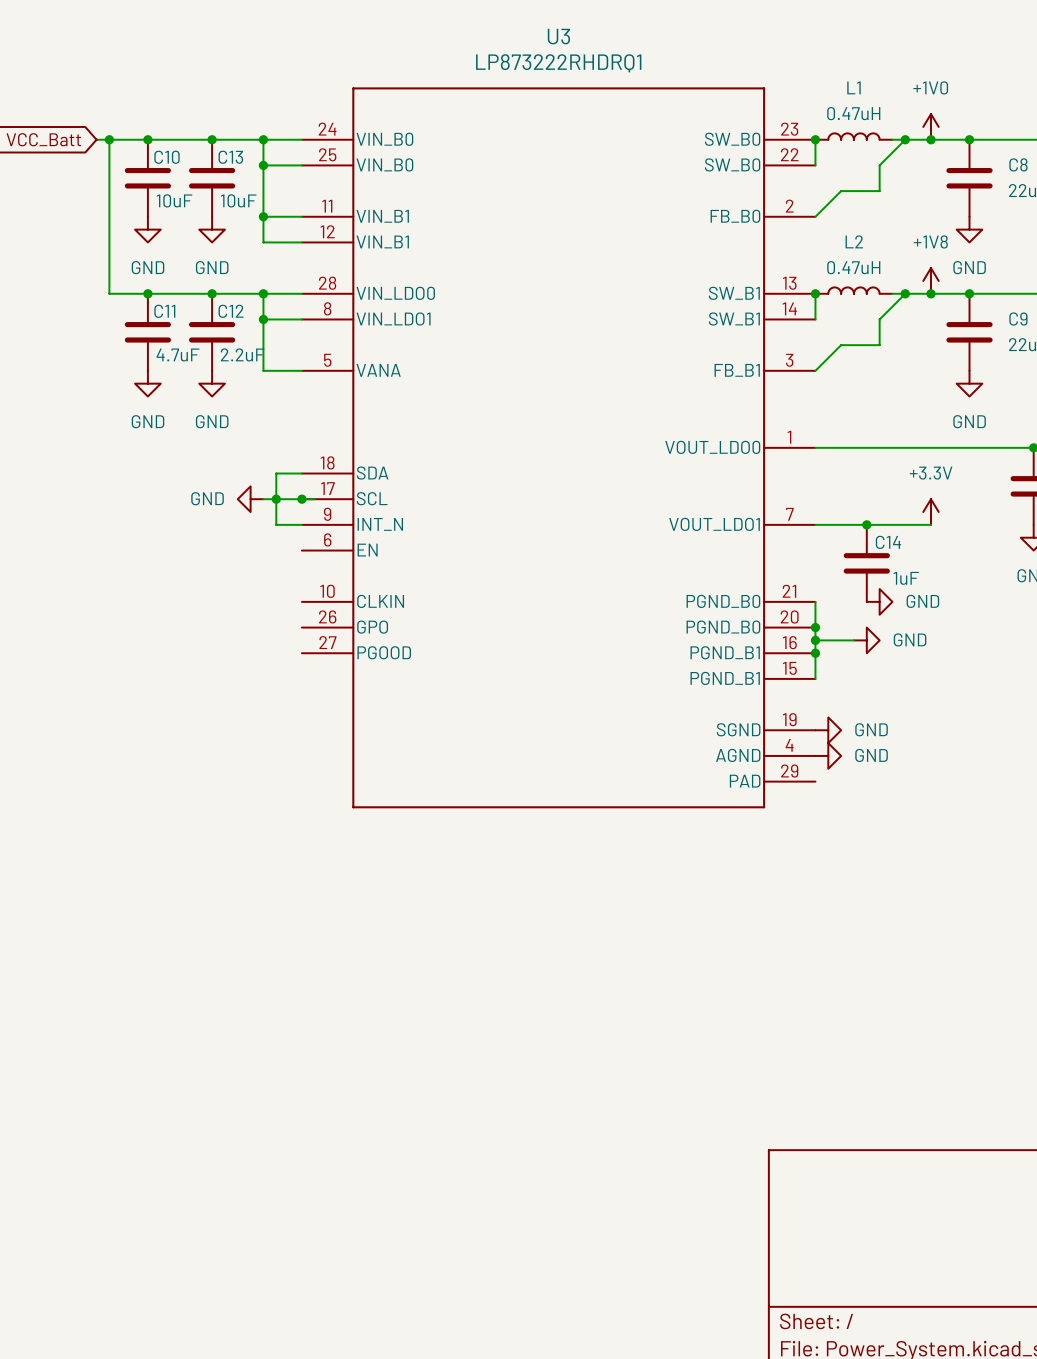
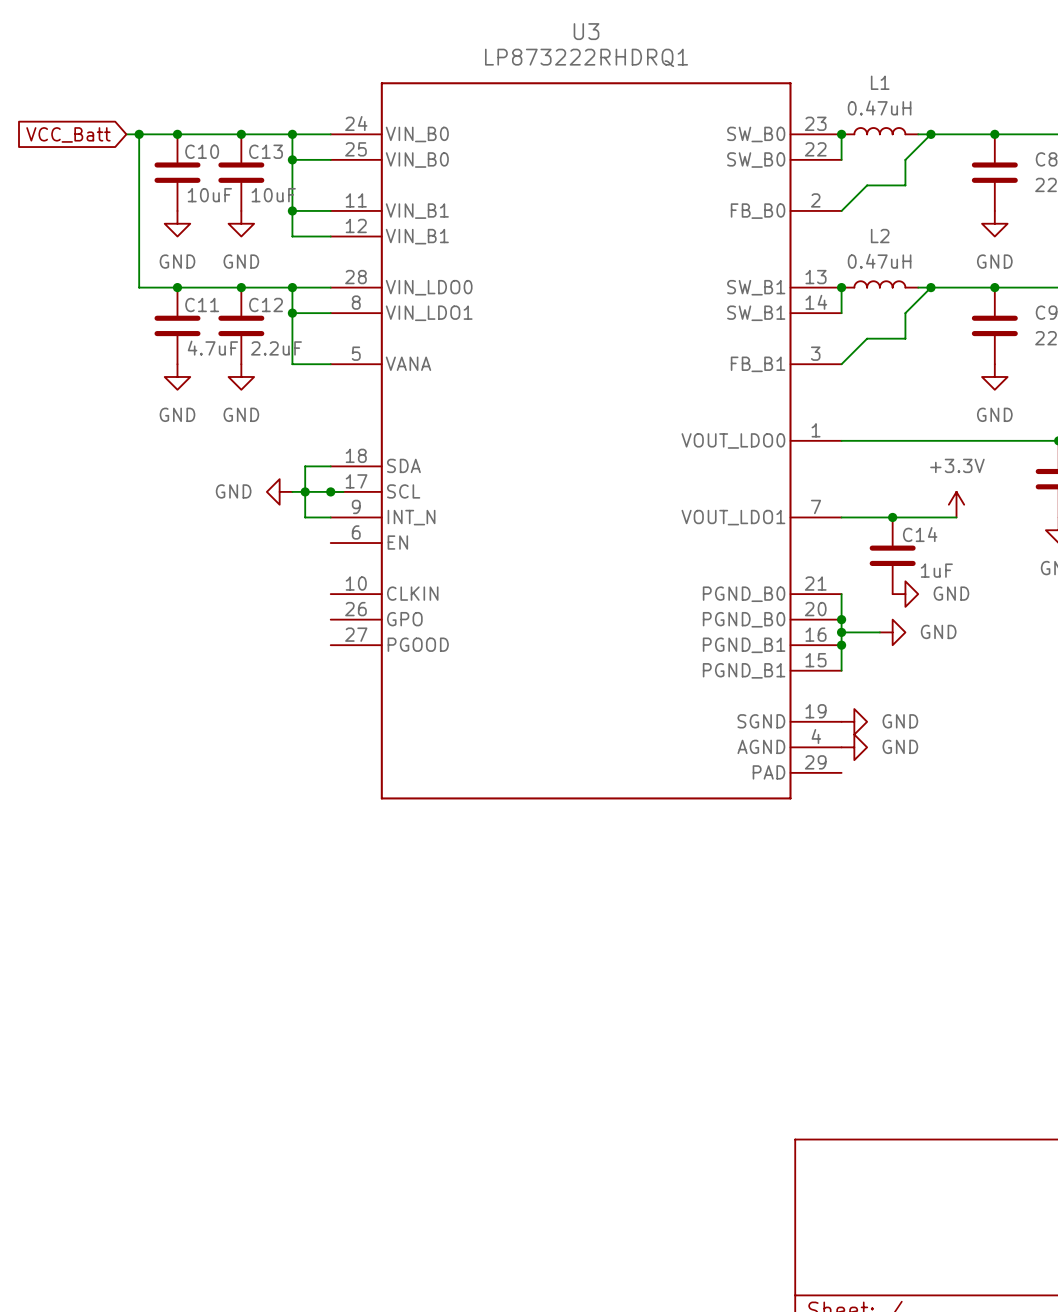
power symbol: +1V0 (930, 126) -> none
junction: (930, 139) -> none
power symbol: +1V8 (930, 280) -> none
junction: (930, 293) -> none

